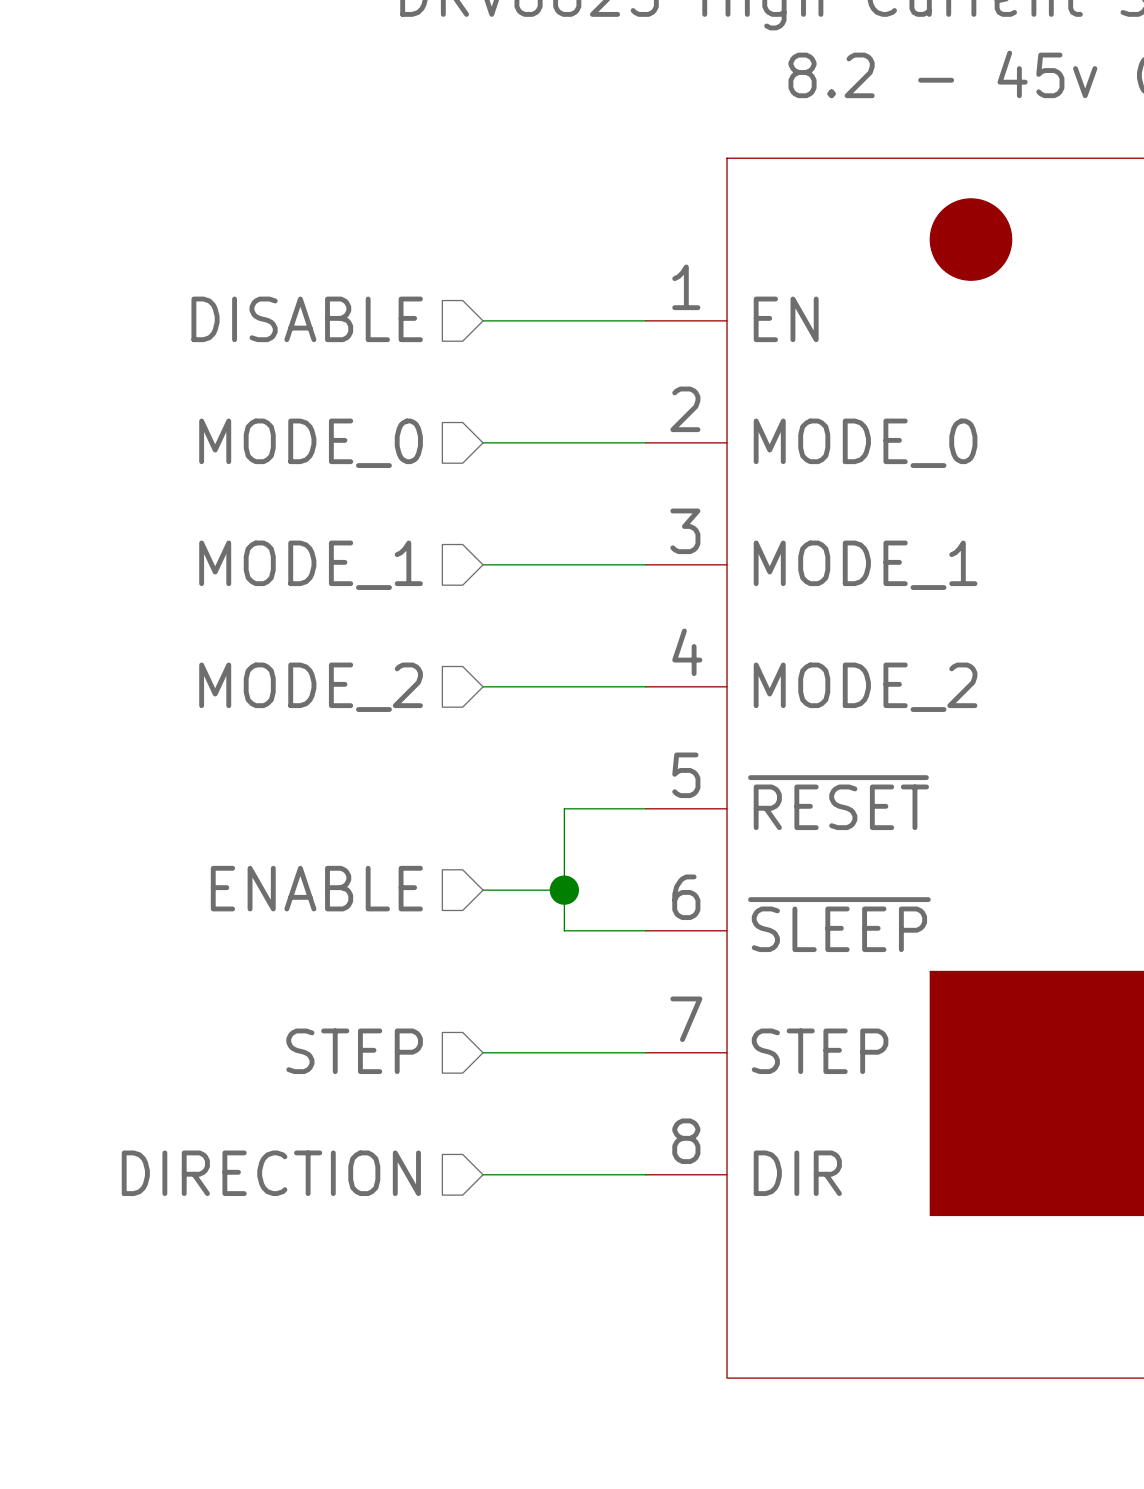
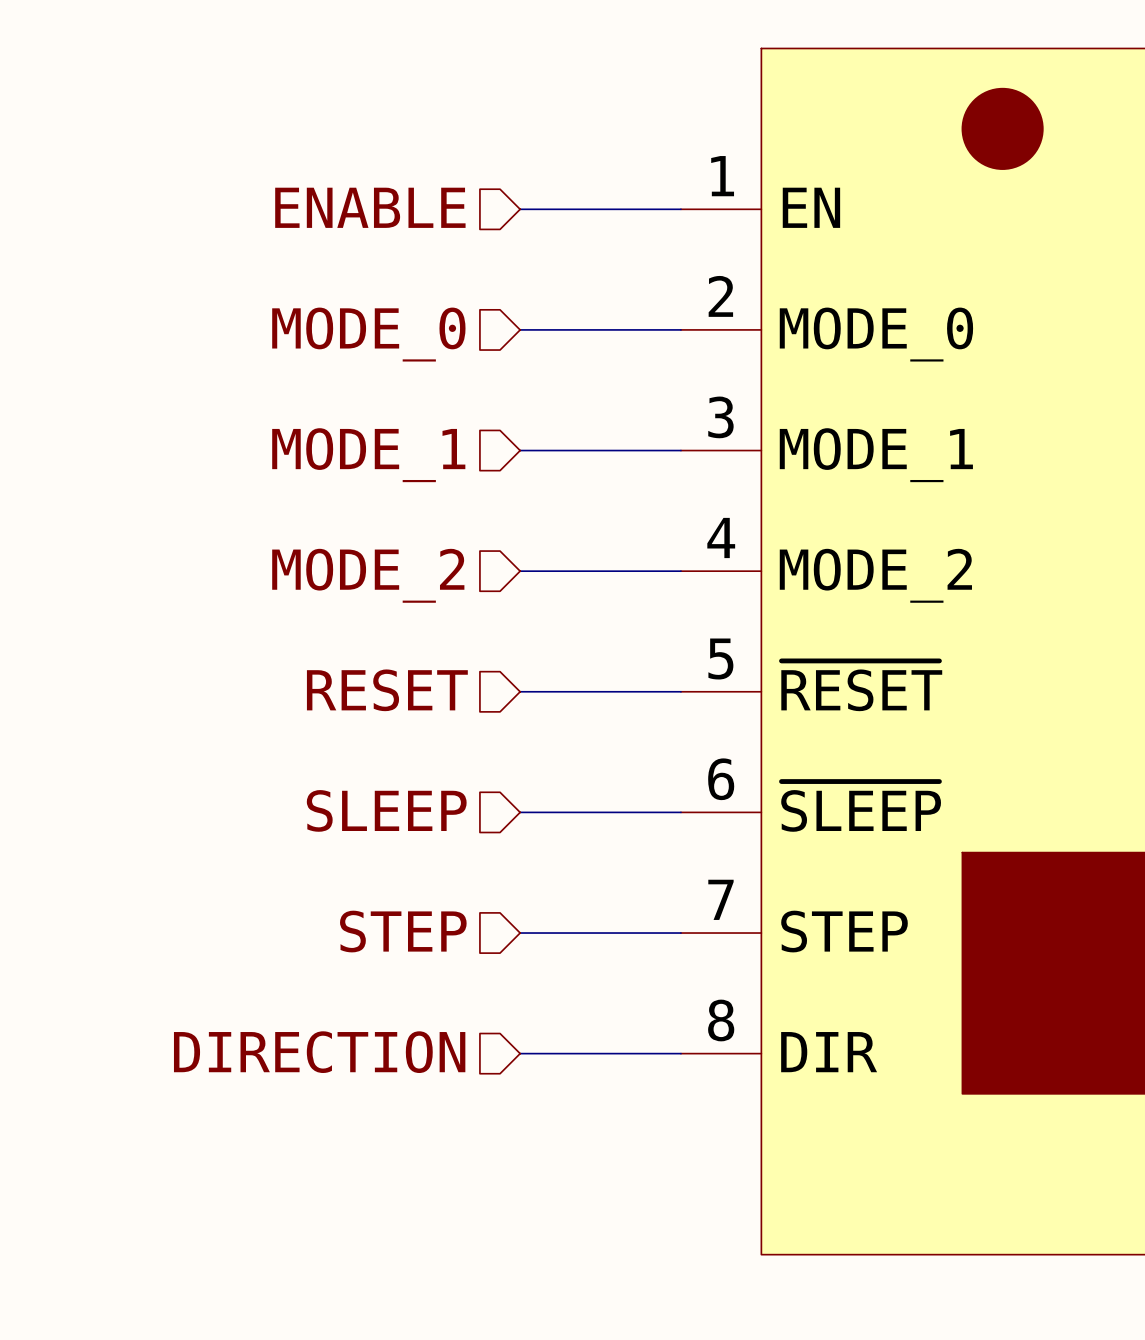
hierarchical label: DISABLE (307, 319) -> ENABLE (370, 207)
hierarchical label: none -> RESET (387, 690)
wire: (564, 808) (564, 930) -> (600, 691) (520, 691)
hierarchical label: ENABLE (316, 888) -> none
wire: (483, 890) (564, 890) -> (520, 812) (600, 812)
junction: (564, 890) -> none
hierarchical label: none -> SLEEP (386, 810)

